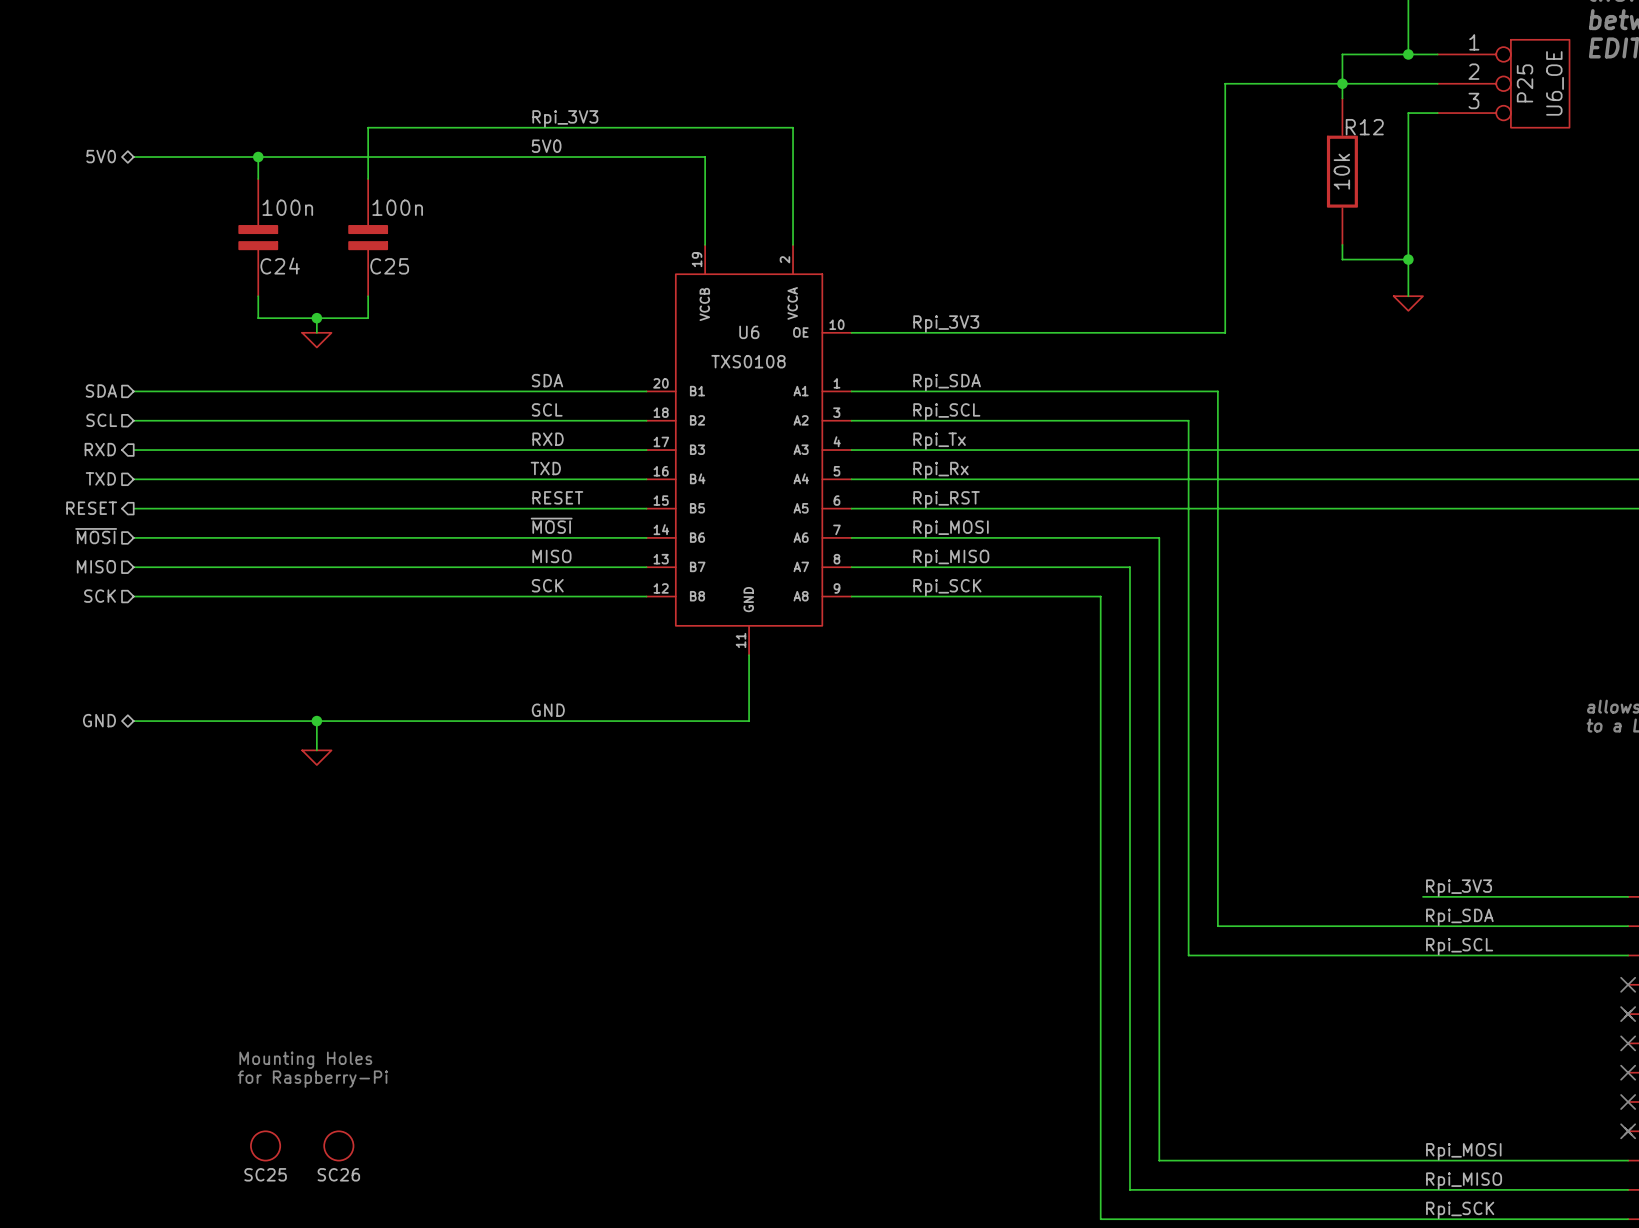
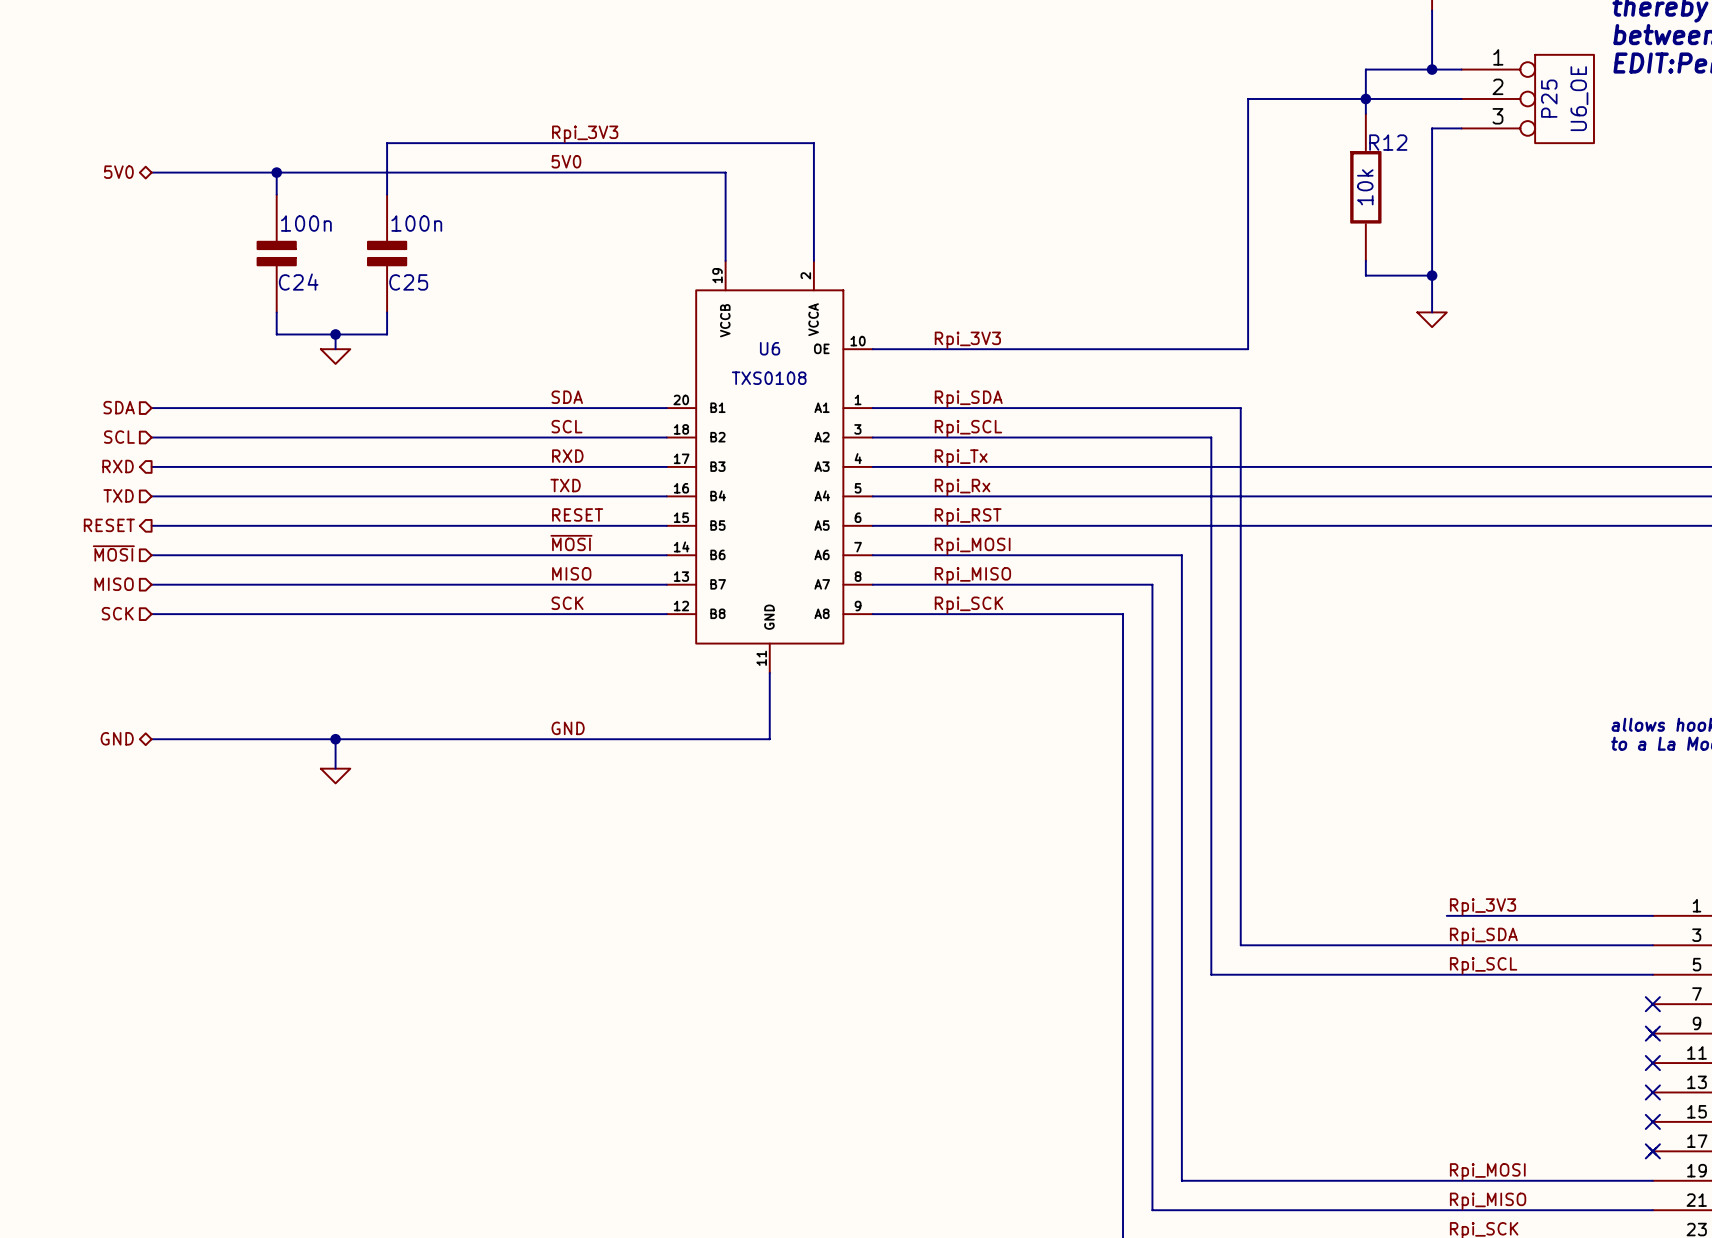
text: Mounting Holes (305, 1060) -> none
text: for Raspberry-Pi (312, 1079) -> none
SC25: (265, 1145) -> none
SC26: (338, 1145) -> none

